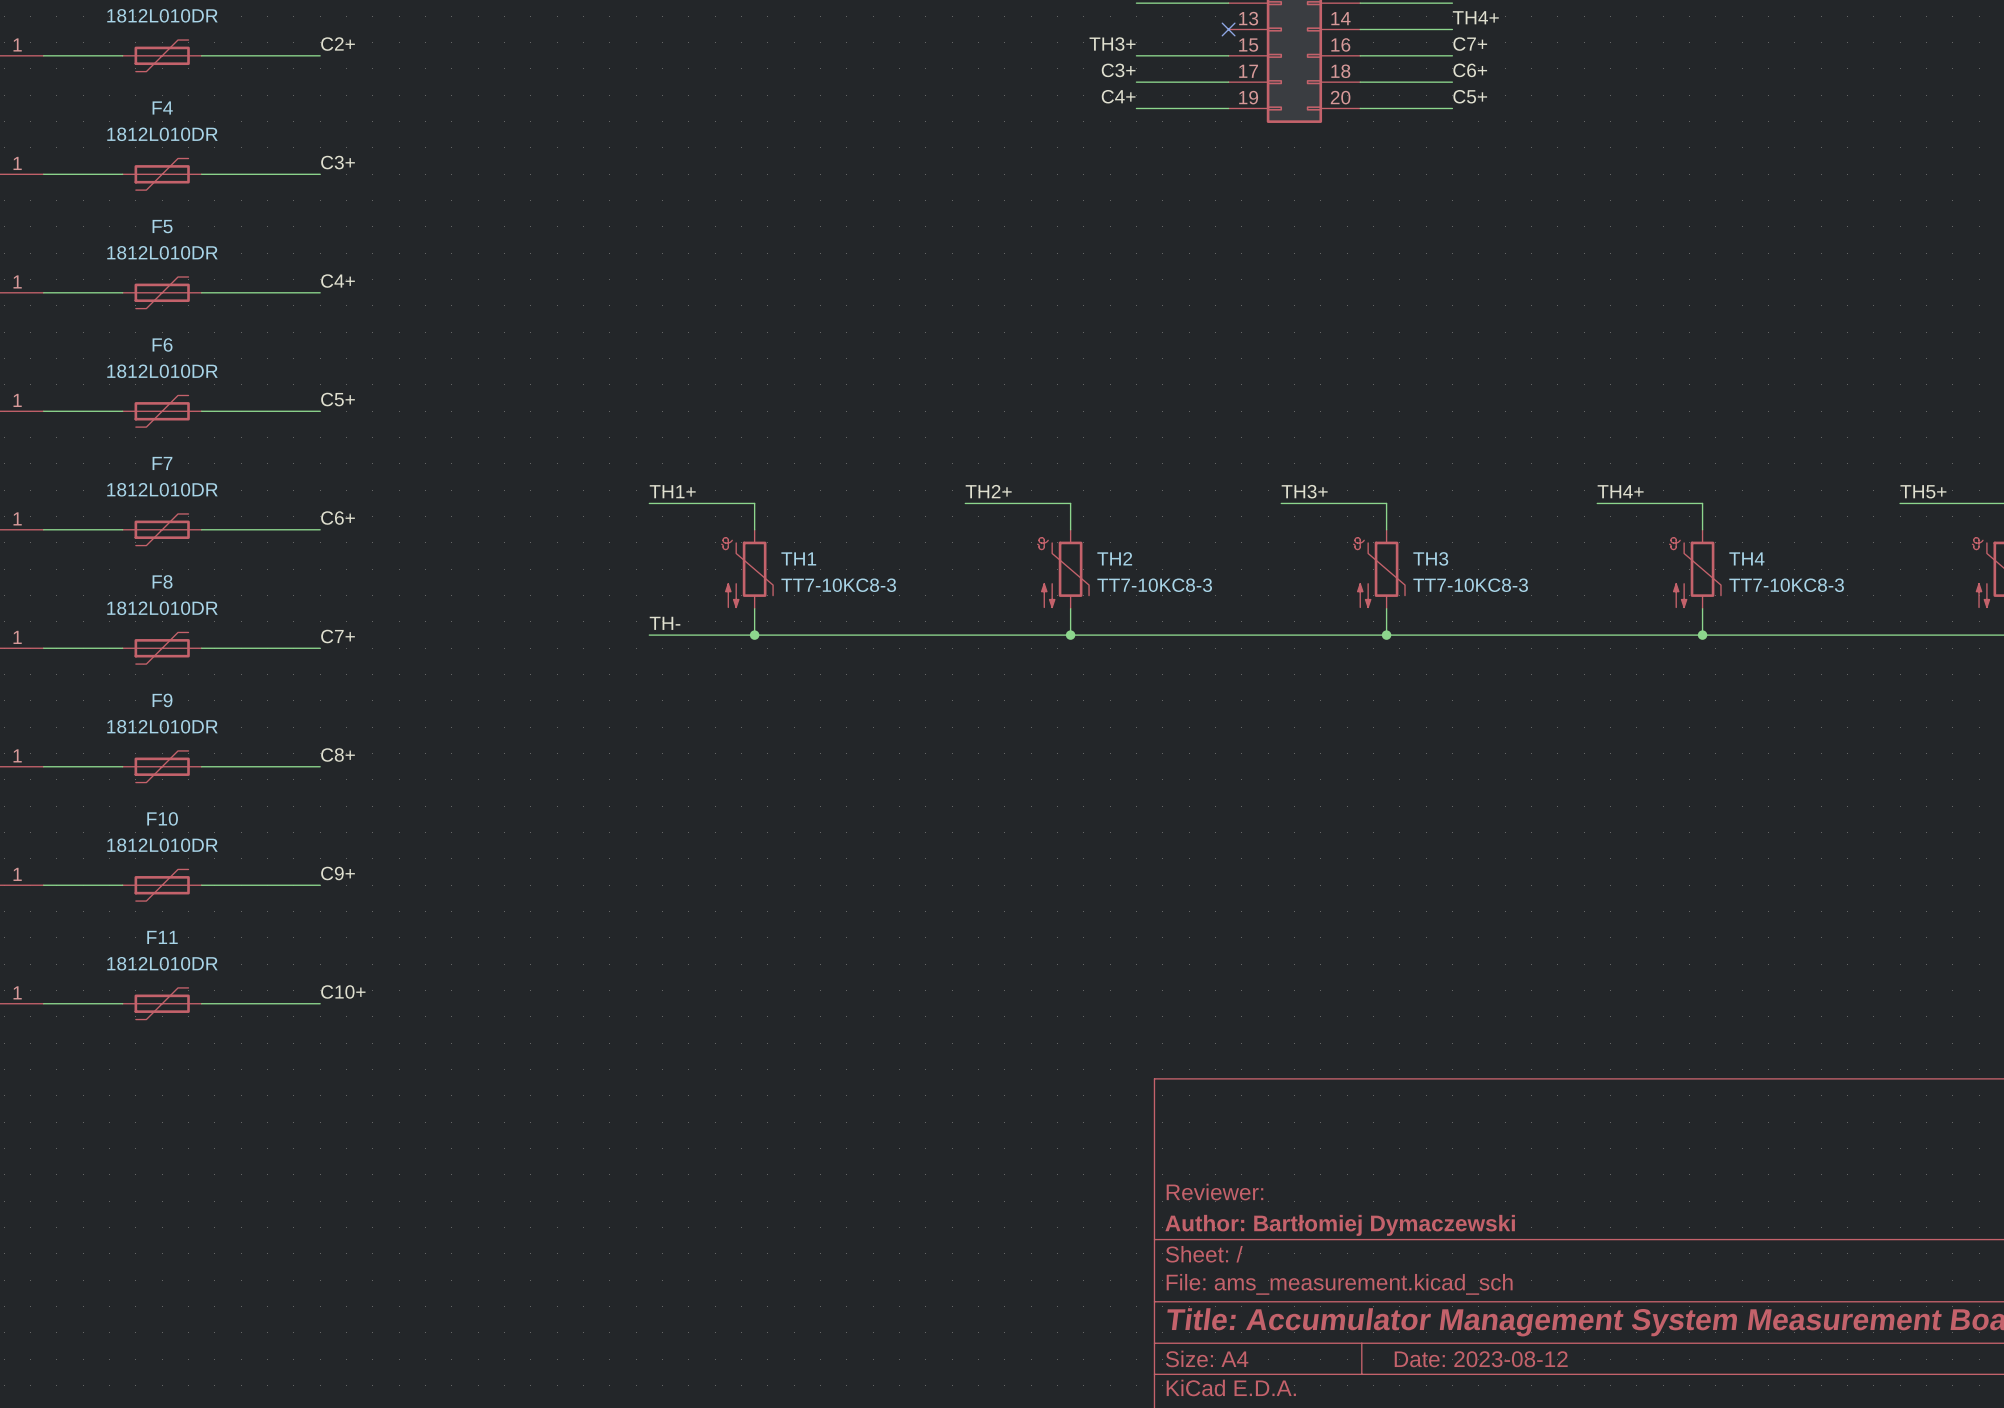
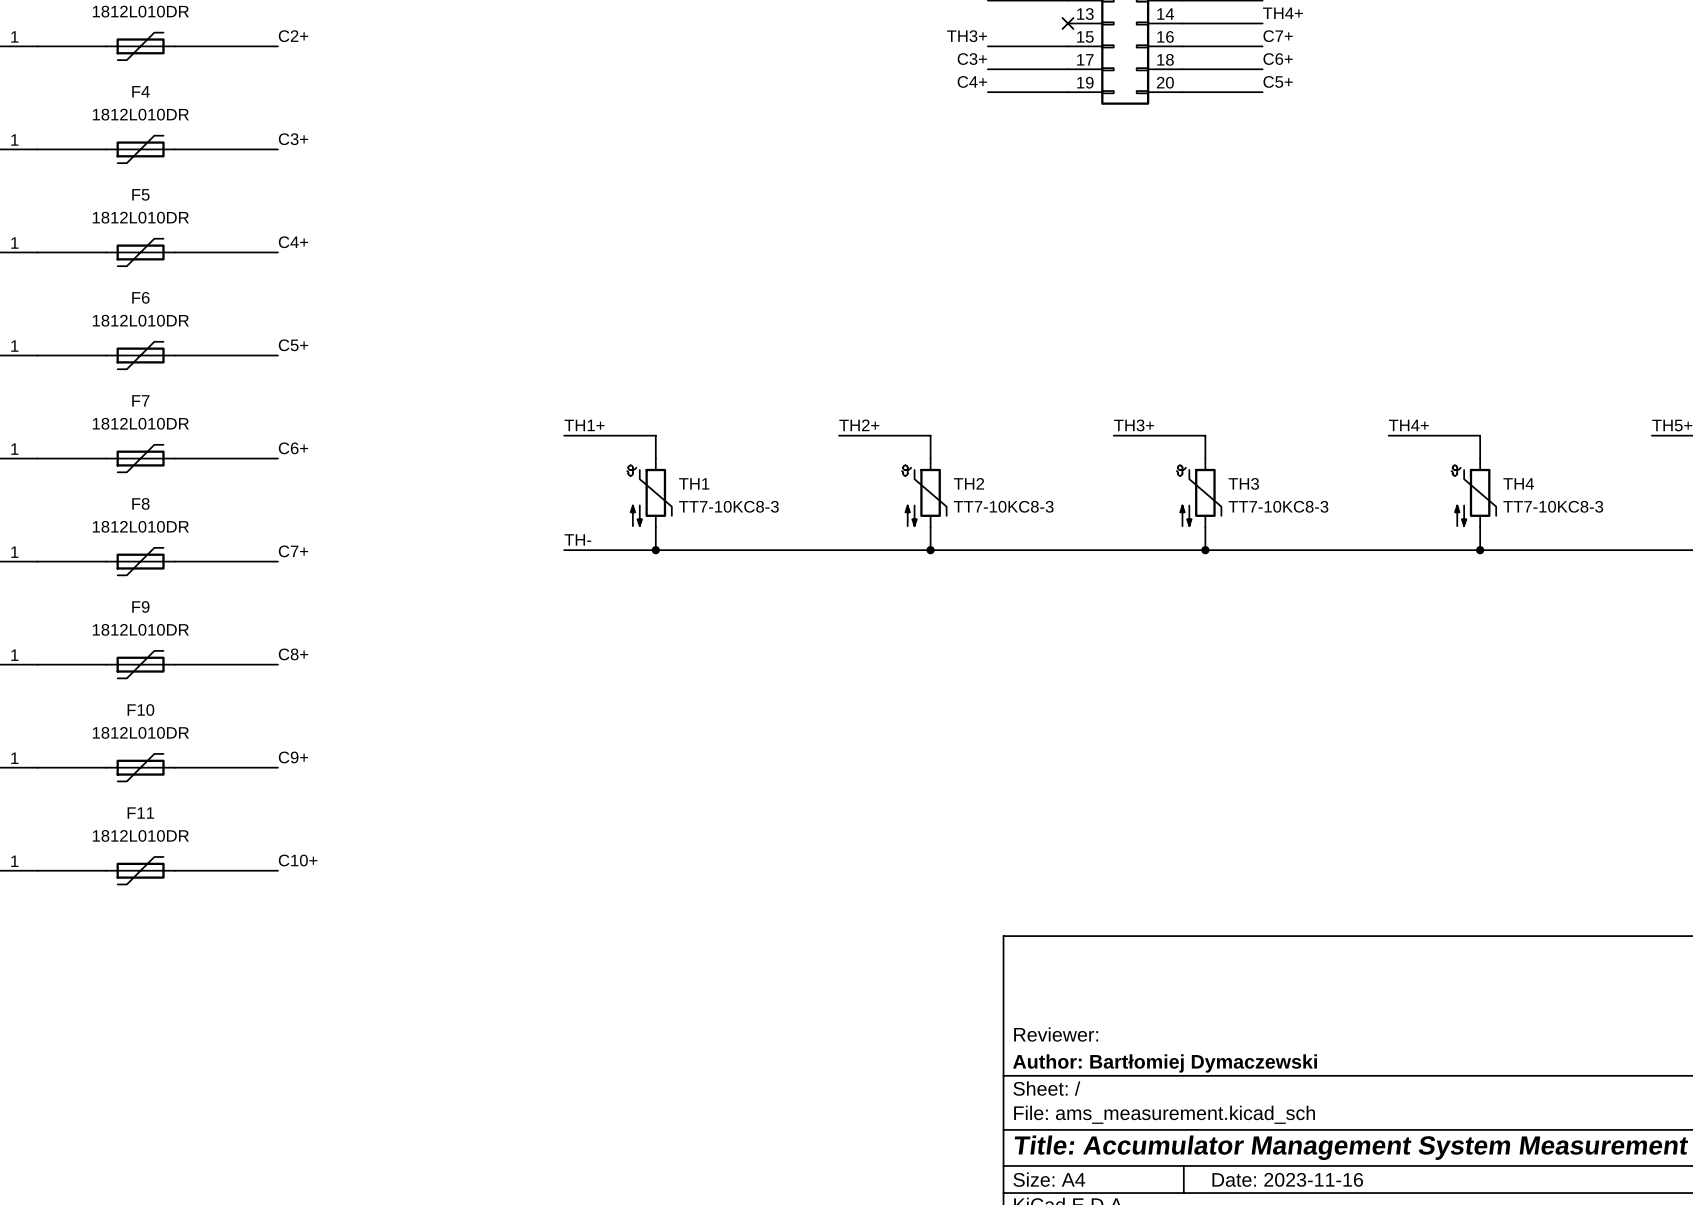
title block: Date: 2023-08-12 (1481, 1359) -> Date: 2023-11-16 (1287, 1179)

